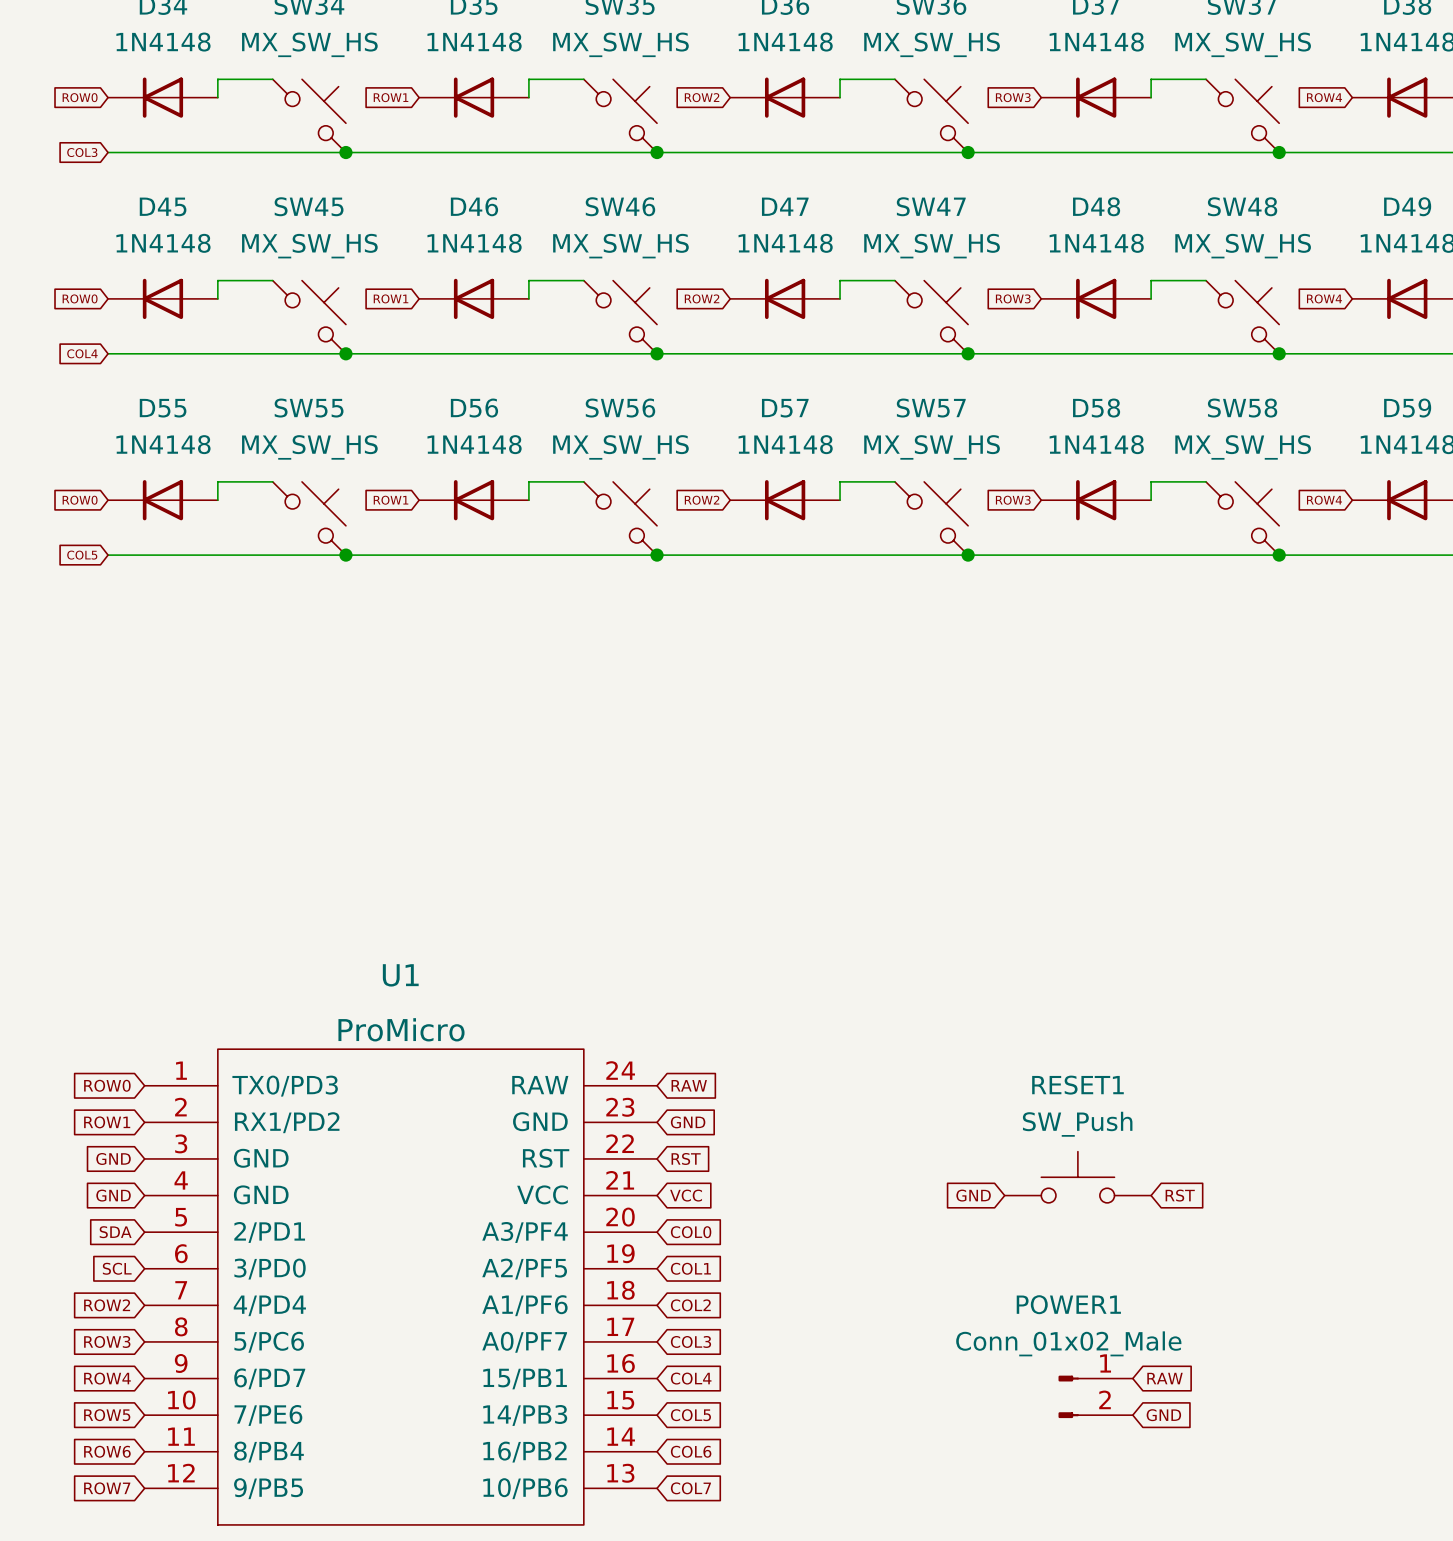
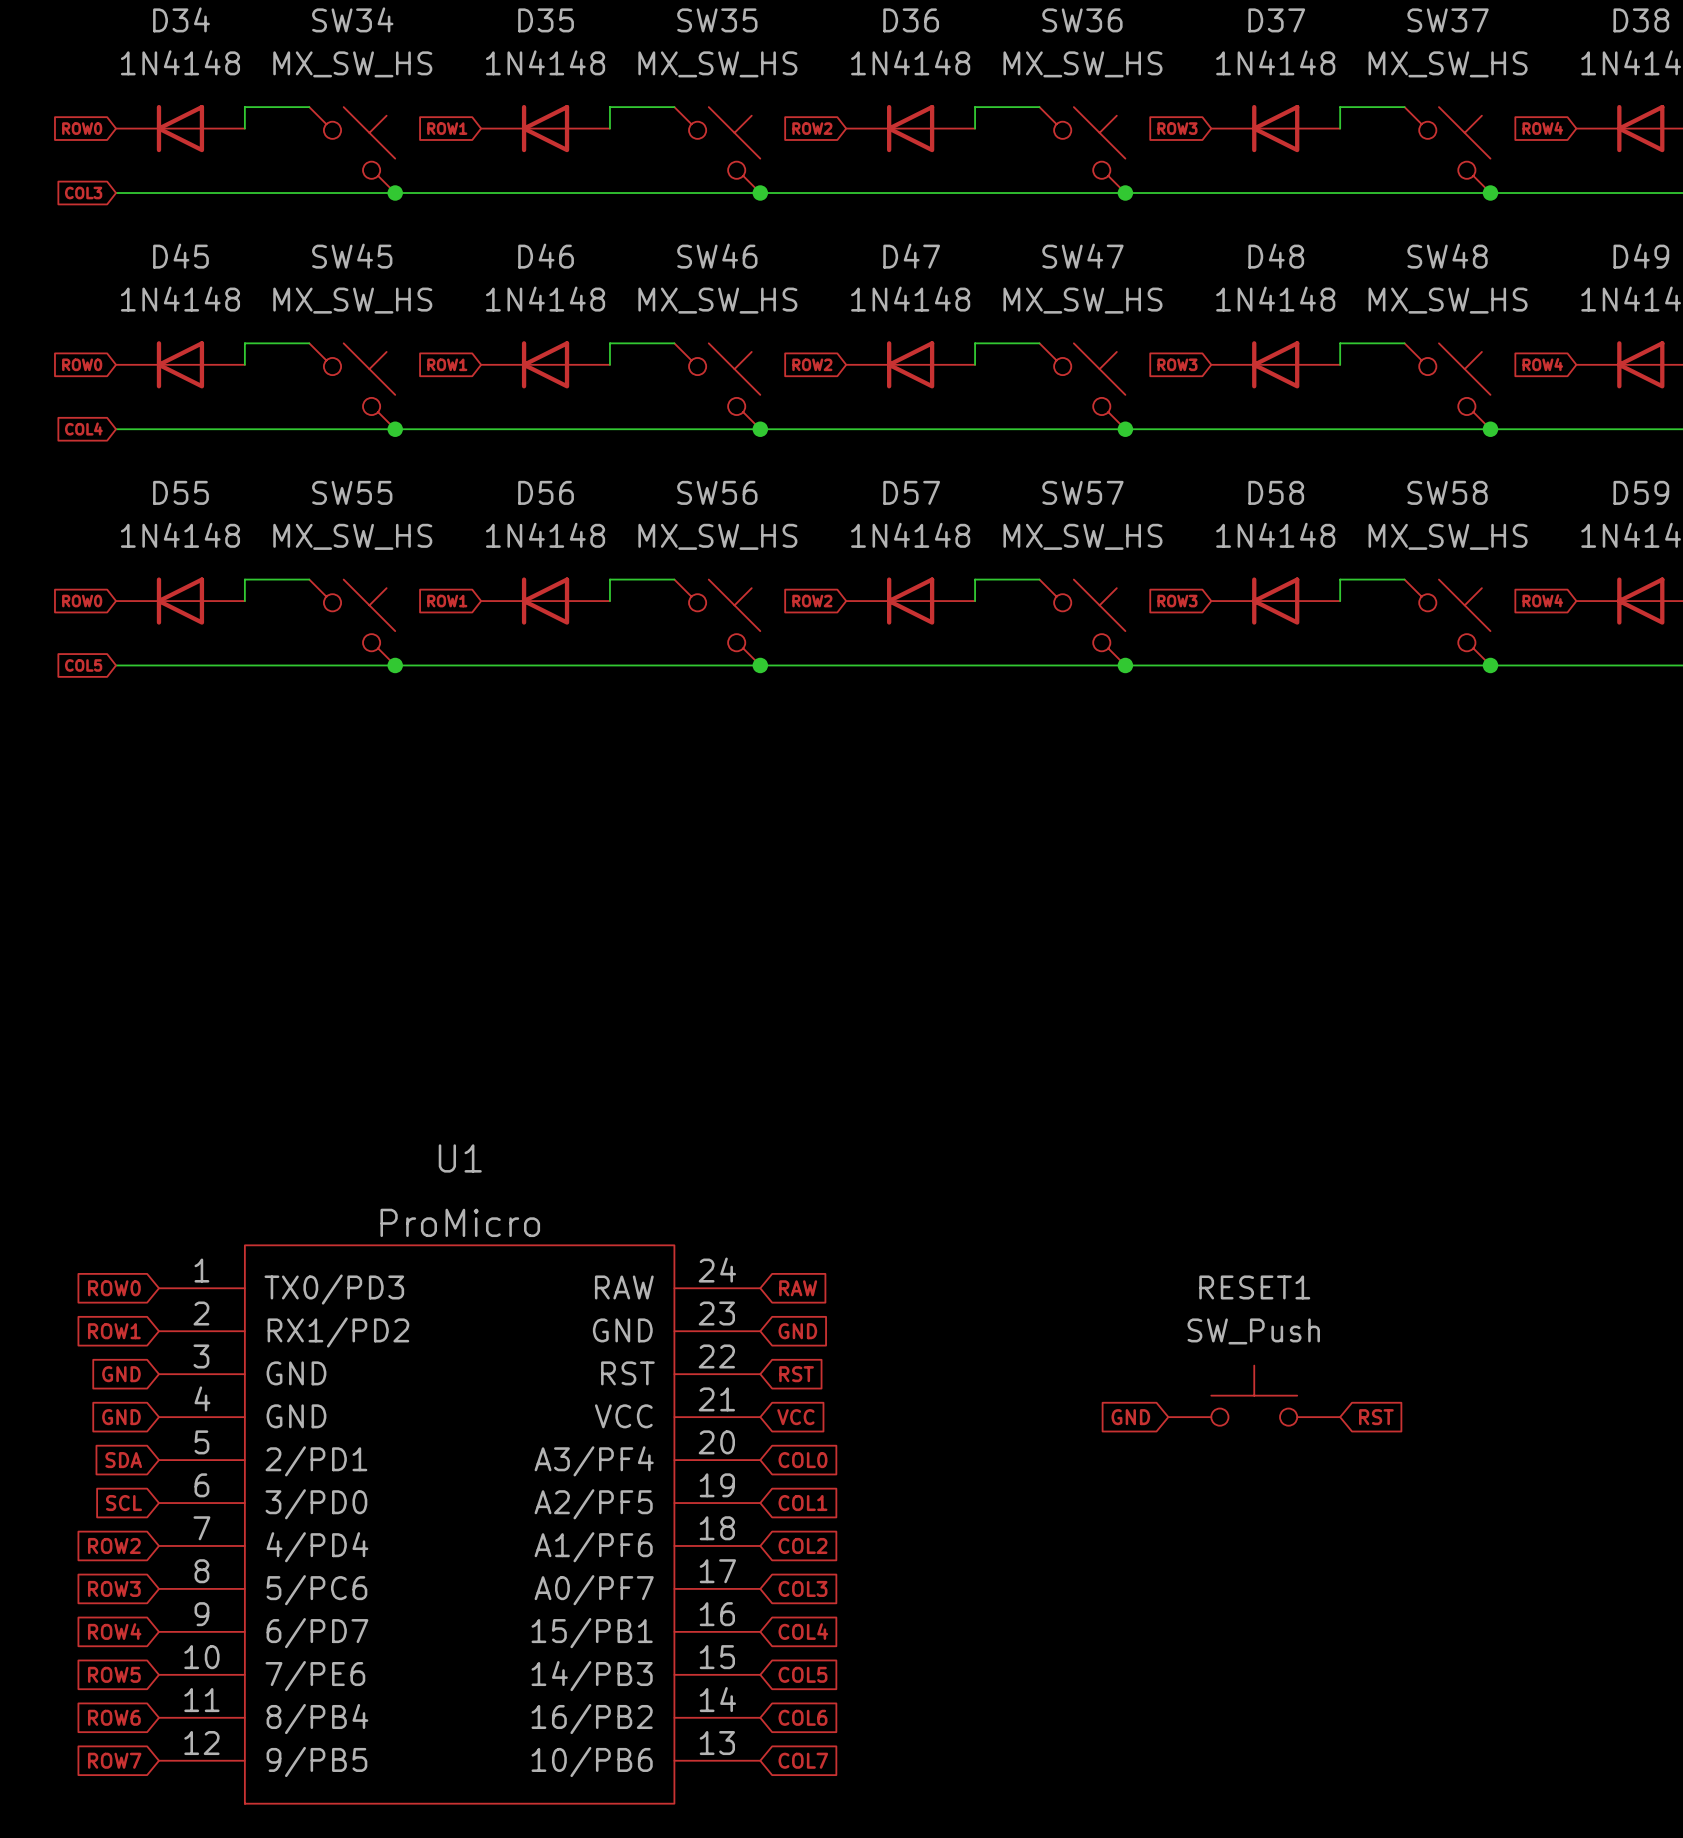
global label: RAW (1165, 1378) -> none
POWER1: Conn_01x02_Male (1095, 1396) -> none
global label: GND (1163, 1415) -> none

